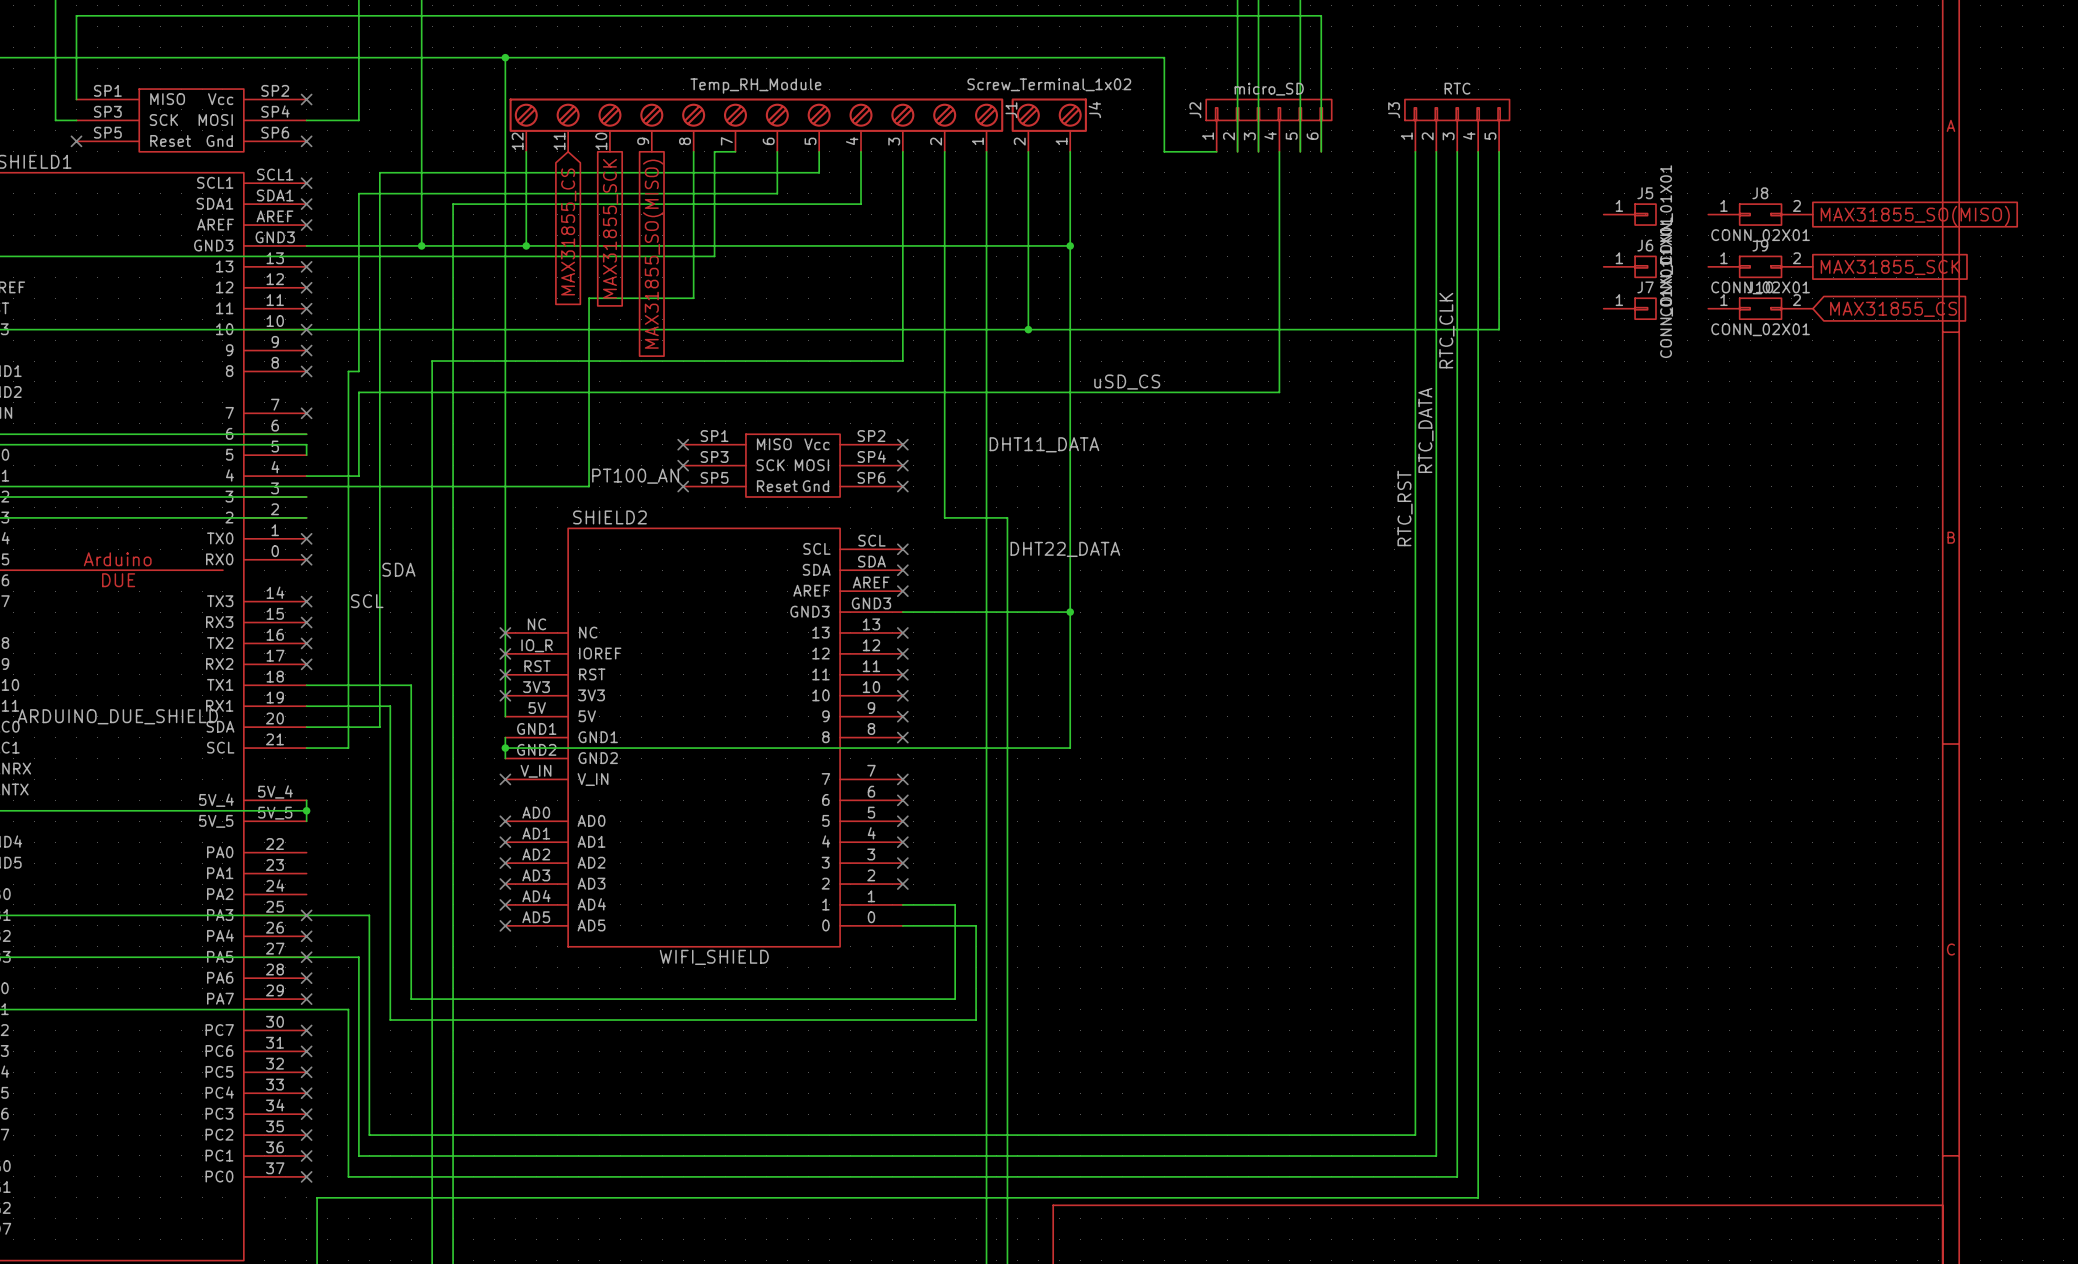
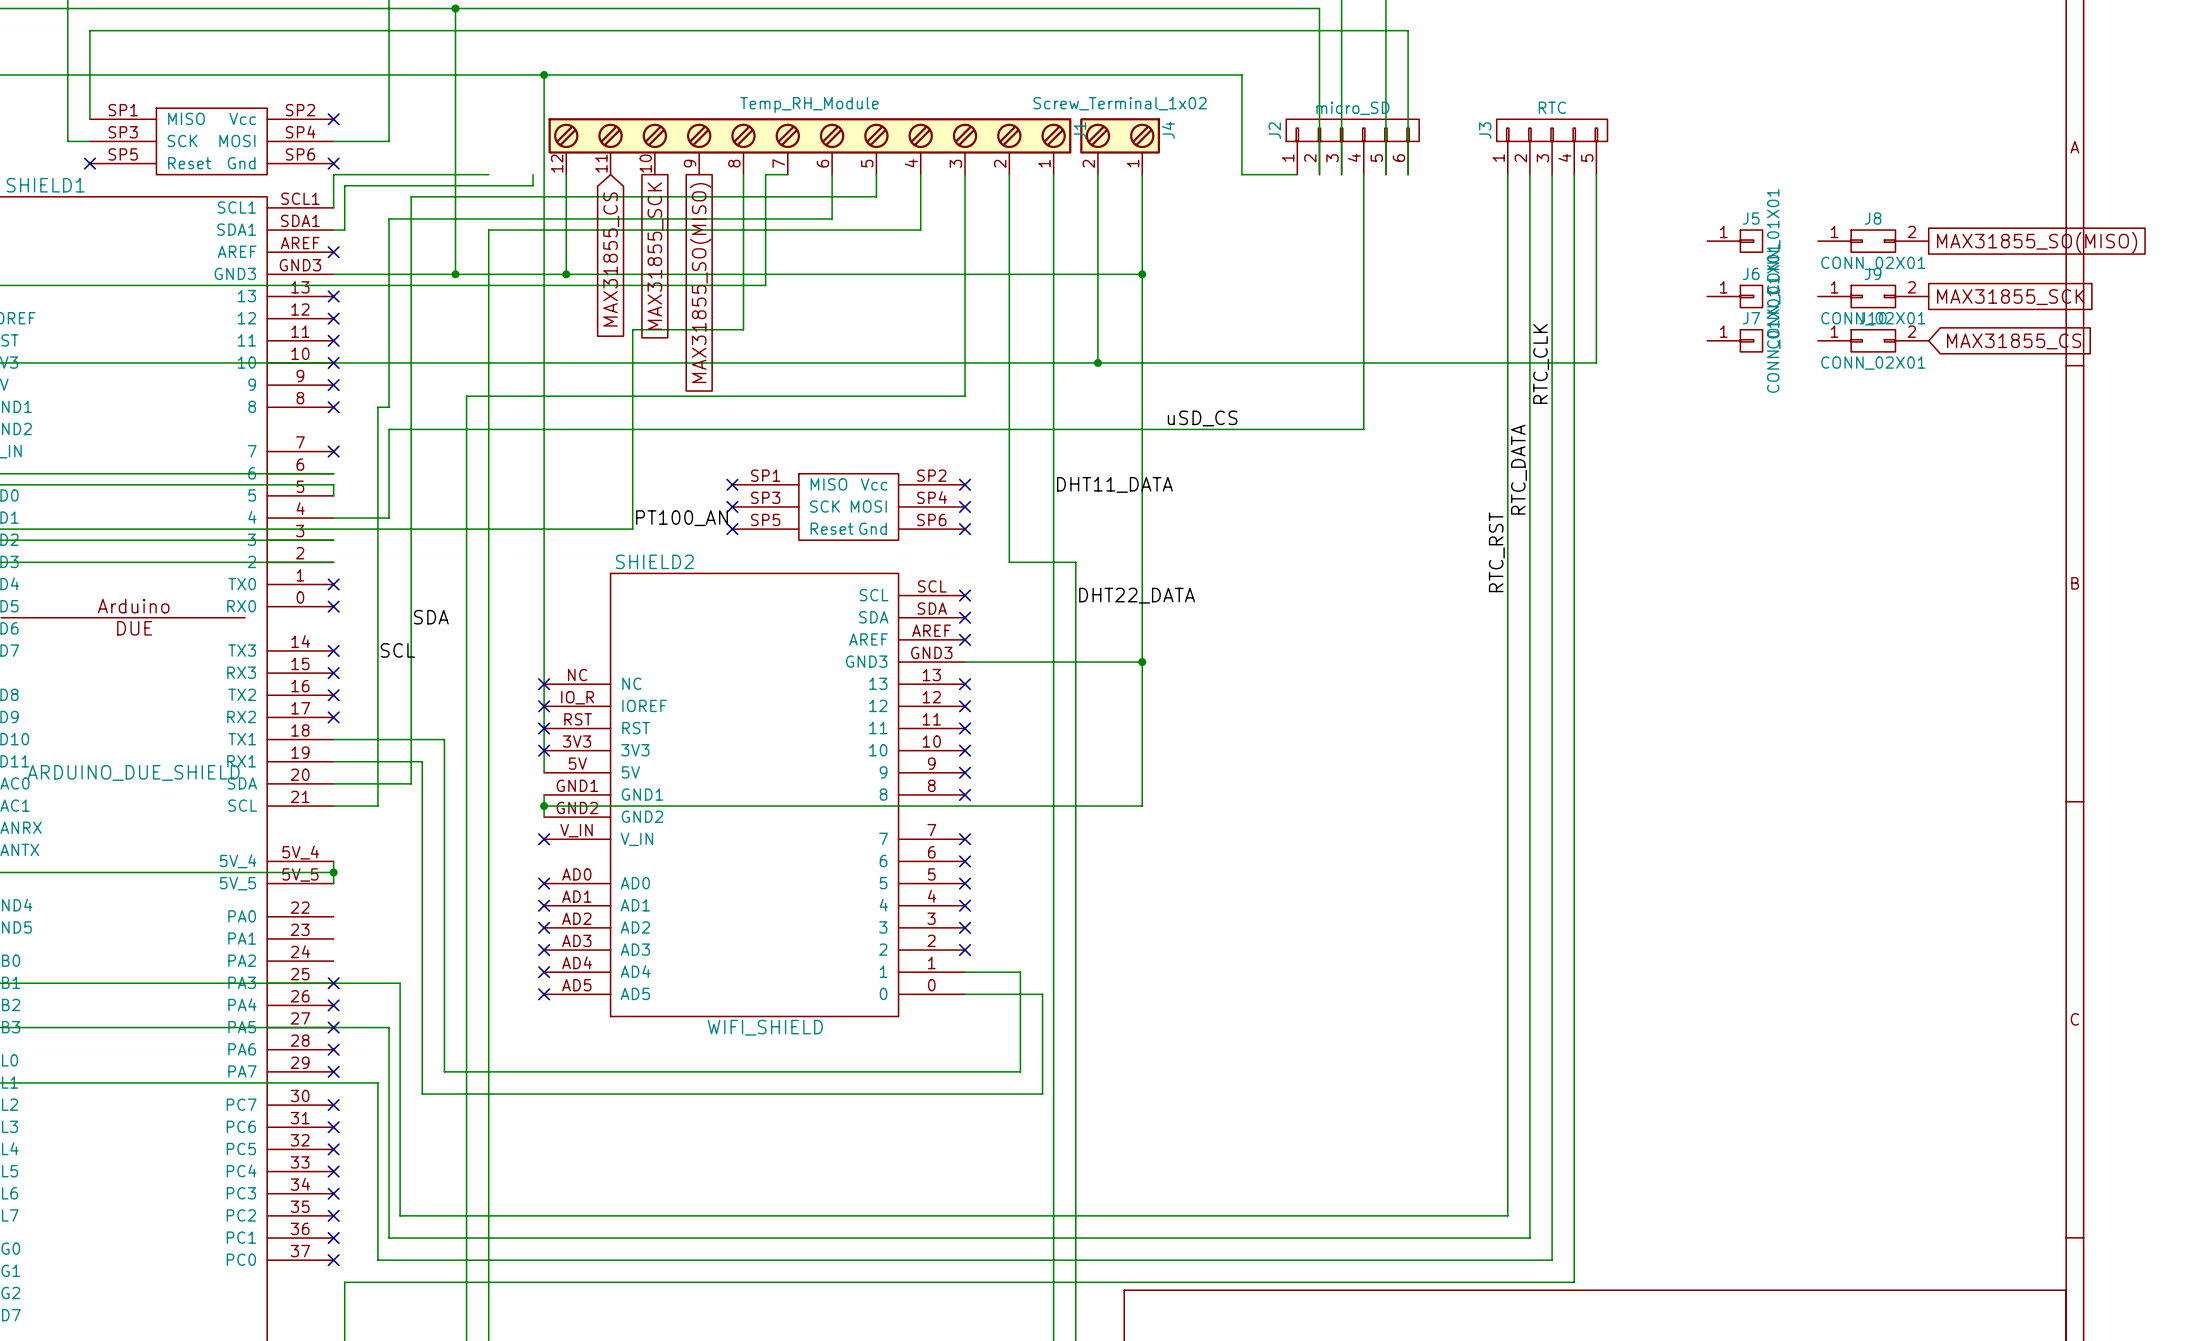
wire: none -> (488, 174) (333, 174) (333, 207)
wire: none -> (533, 174) (533, 185) (344, 185) (344, 230) (333, 230)
no-connect mark: (306, 183) -> none
no-connect mark: (306, 204) -> none

